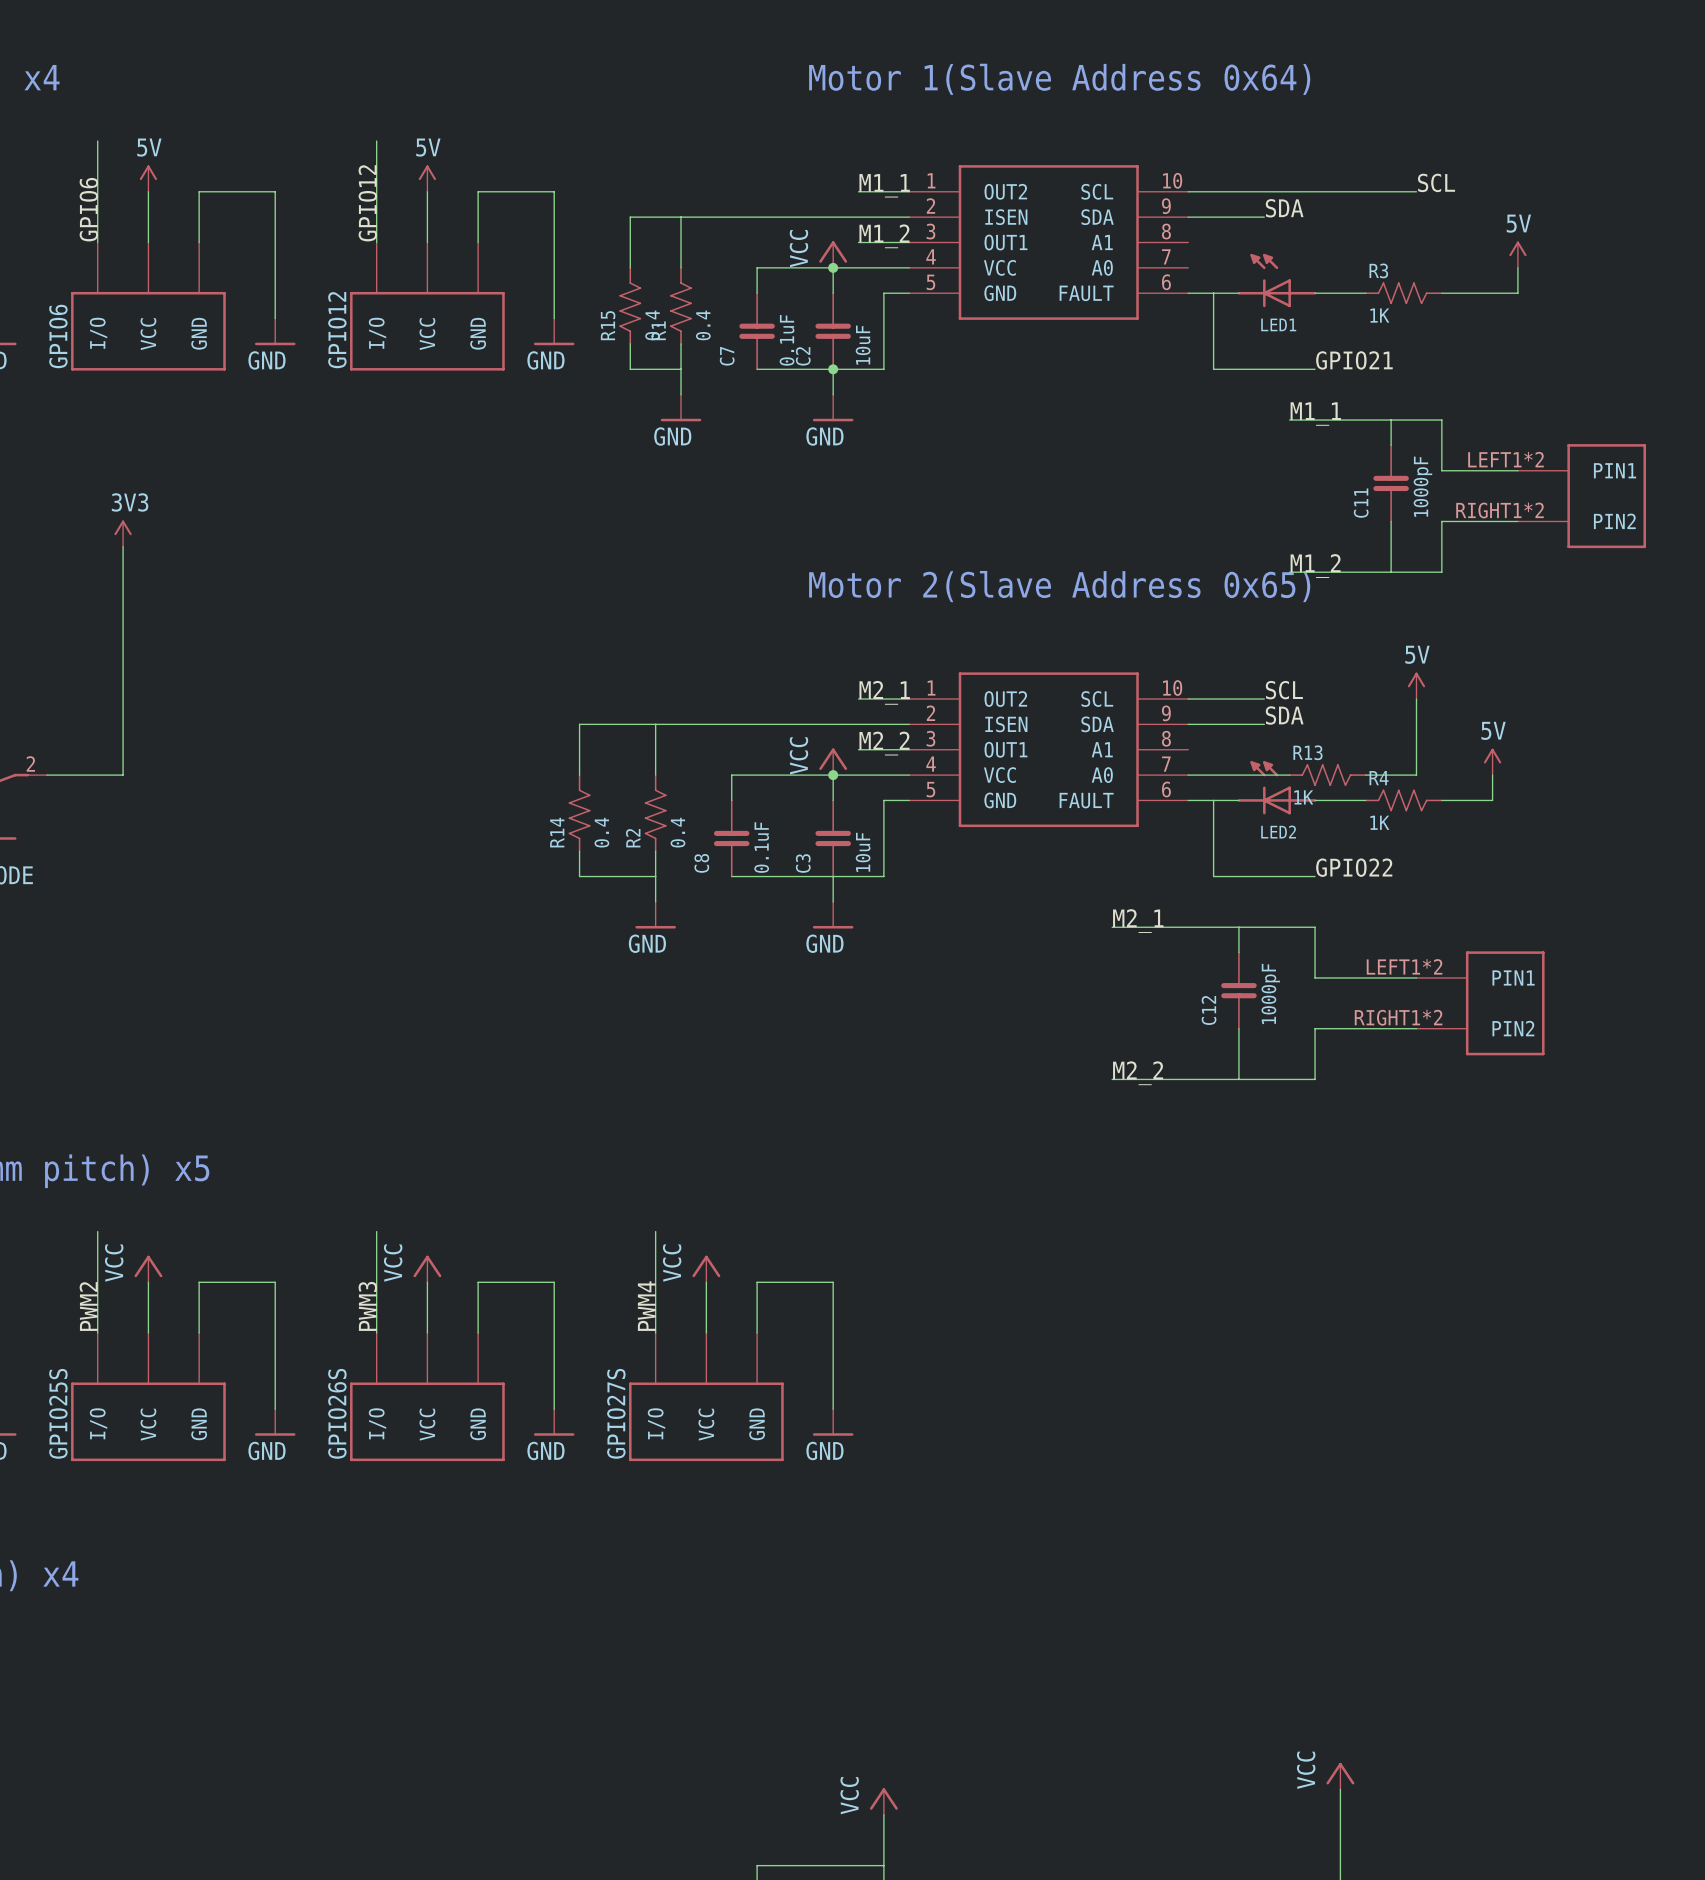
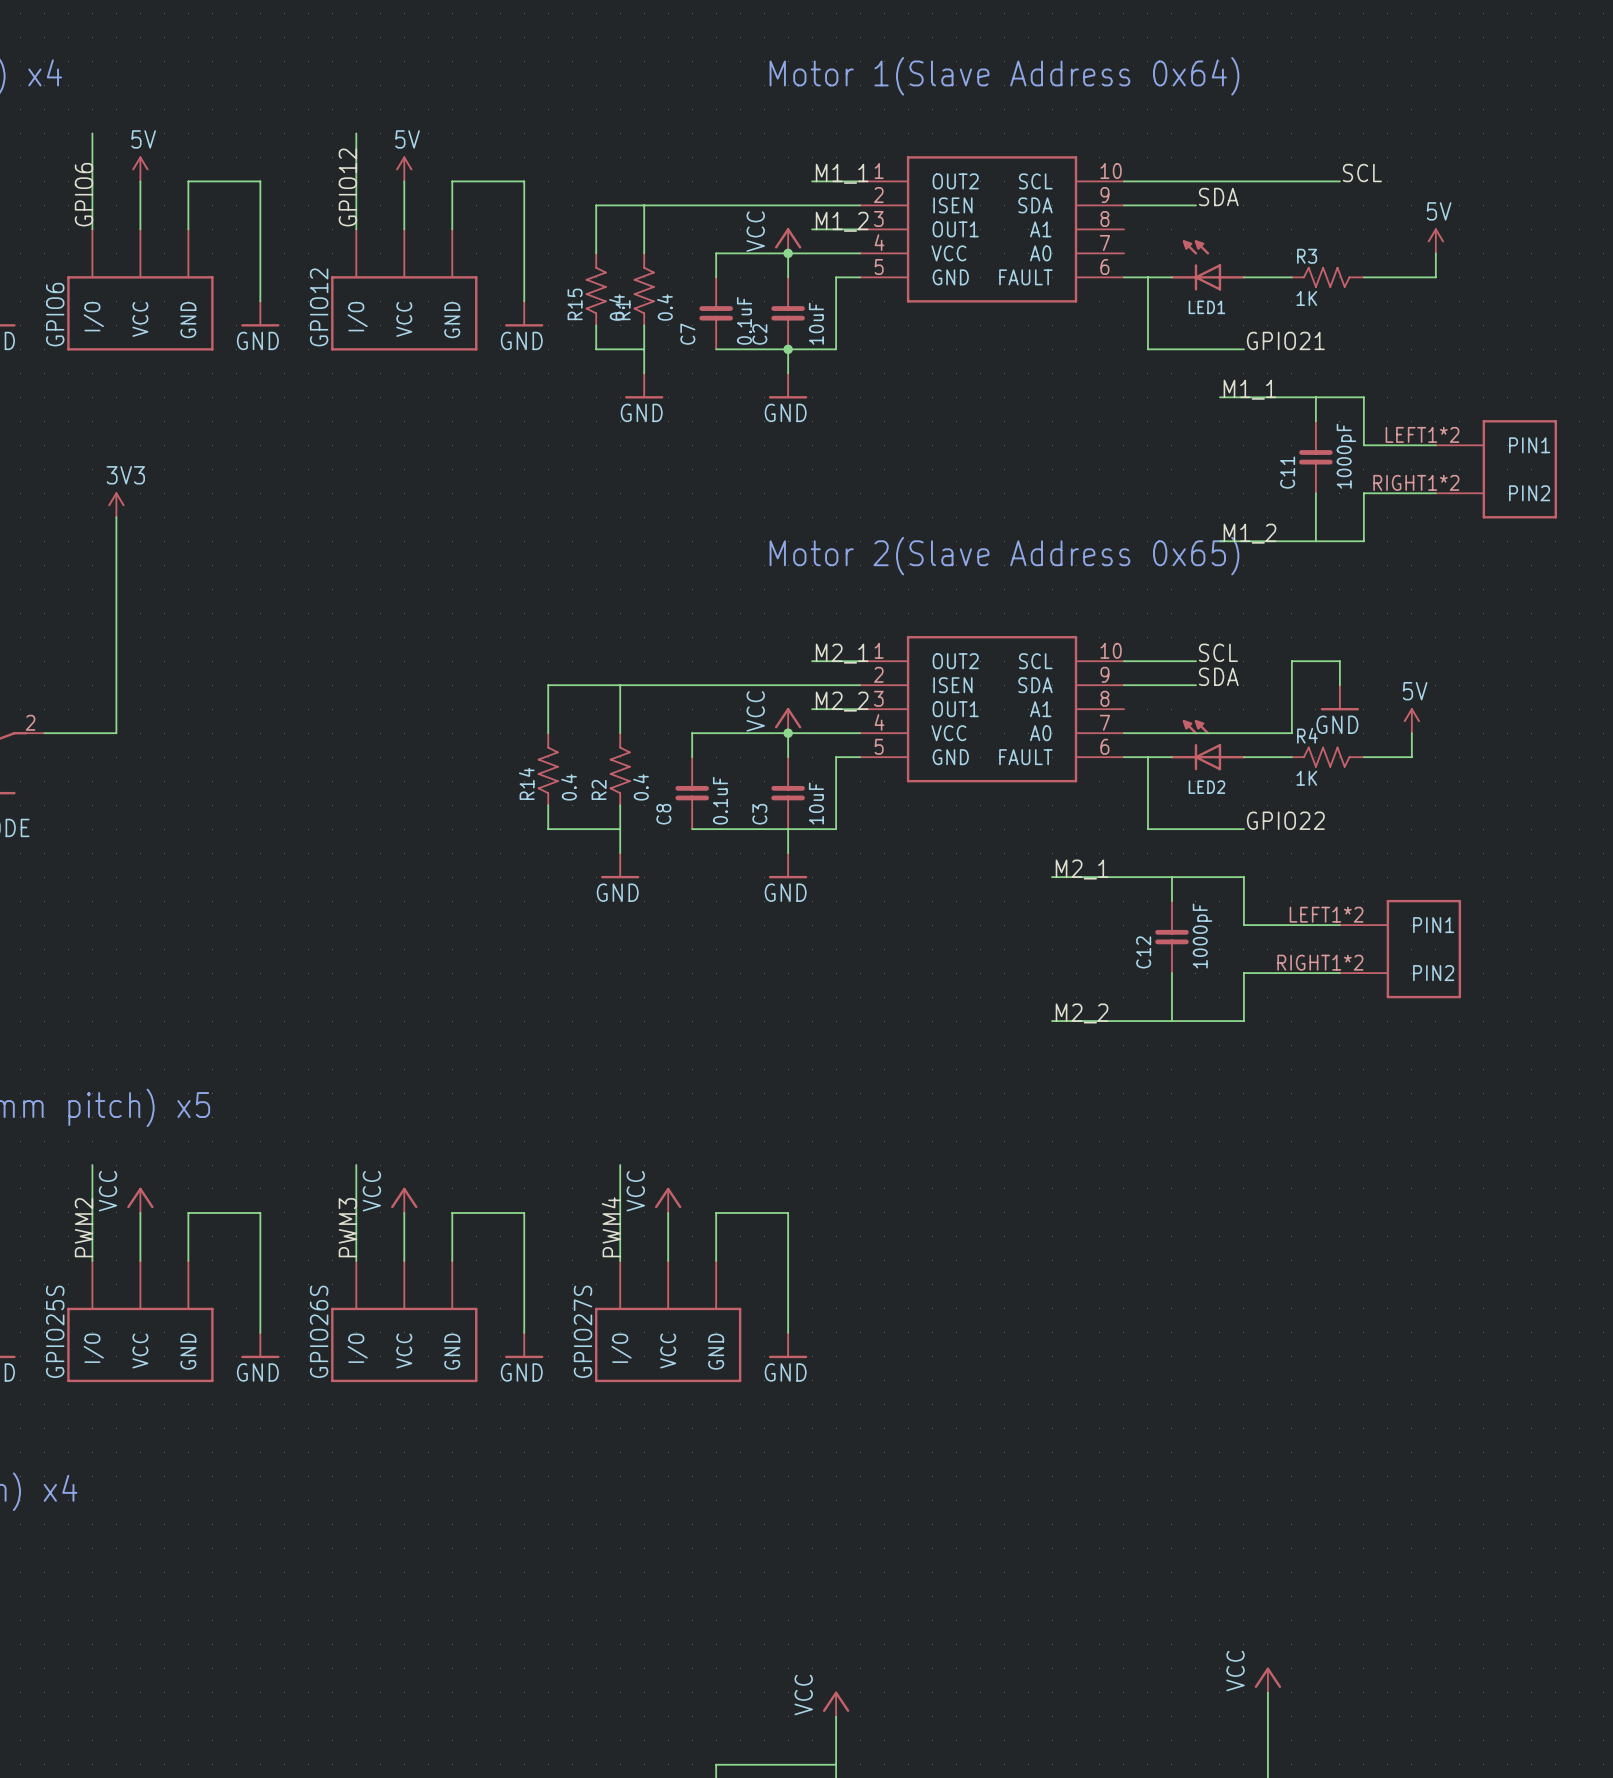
power symbol: 5V (1416, 685) -> none
wire: none -> (1339, 661) (1291, 661) (1291, 733) (1219, 733)
wire: (1416, 724) (1416, 775) (1365, 775) -> none
power symbol: none -> GND (1339, 697)
R13: 1K (1327, 775) -> none

